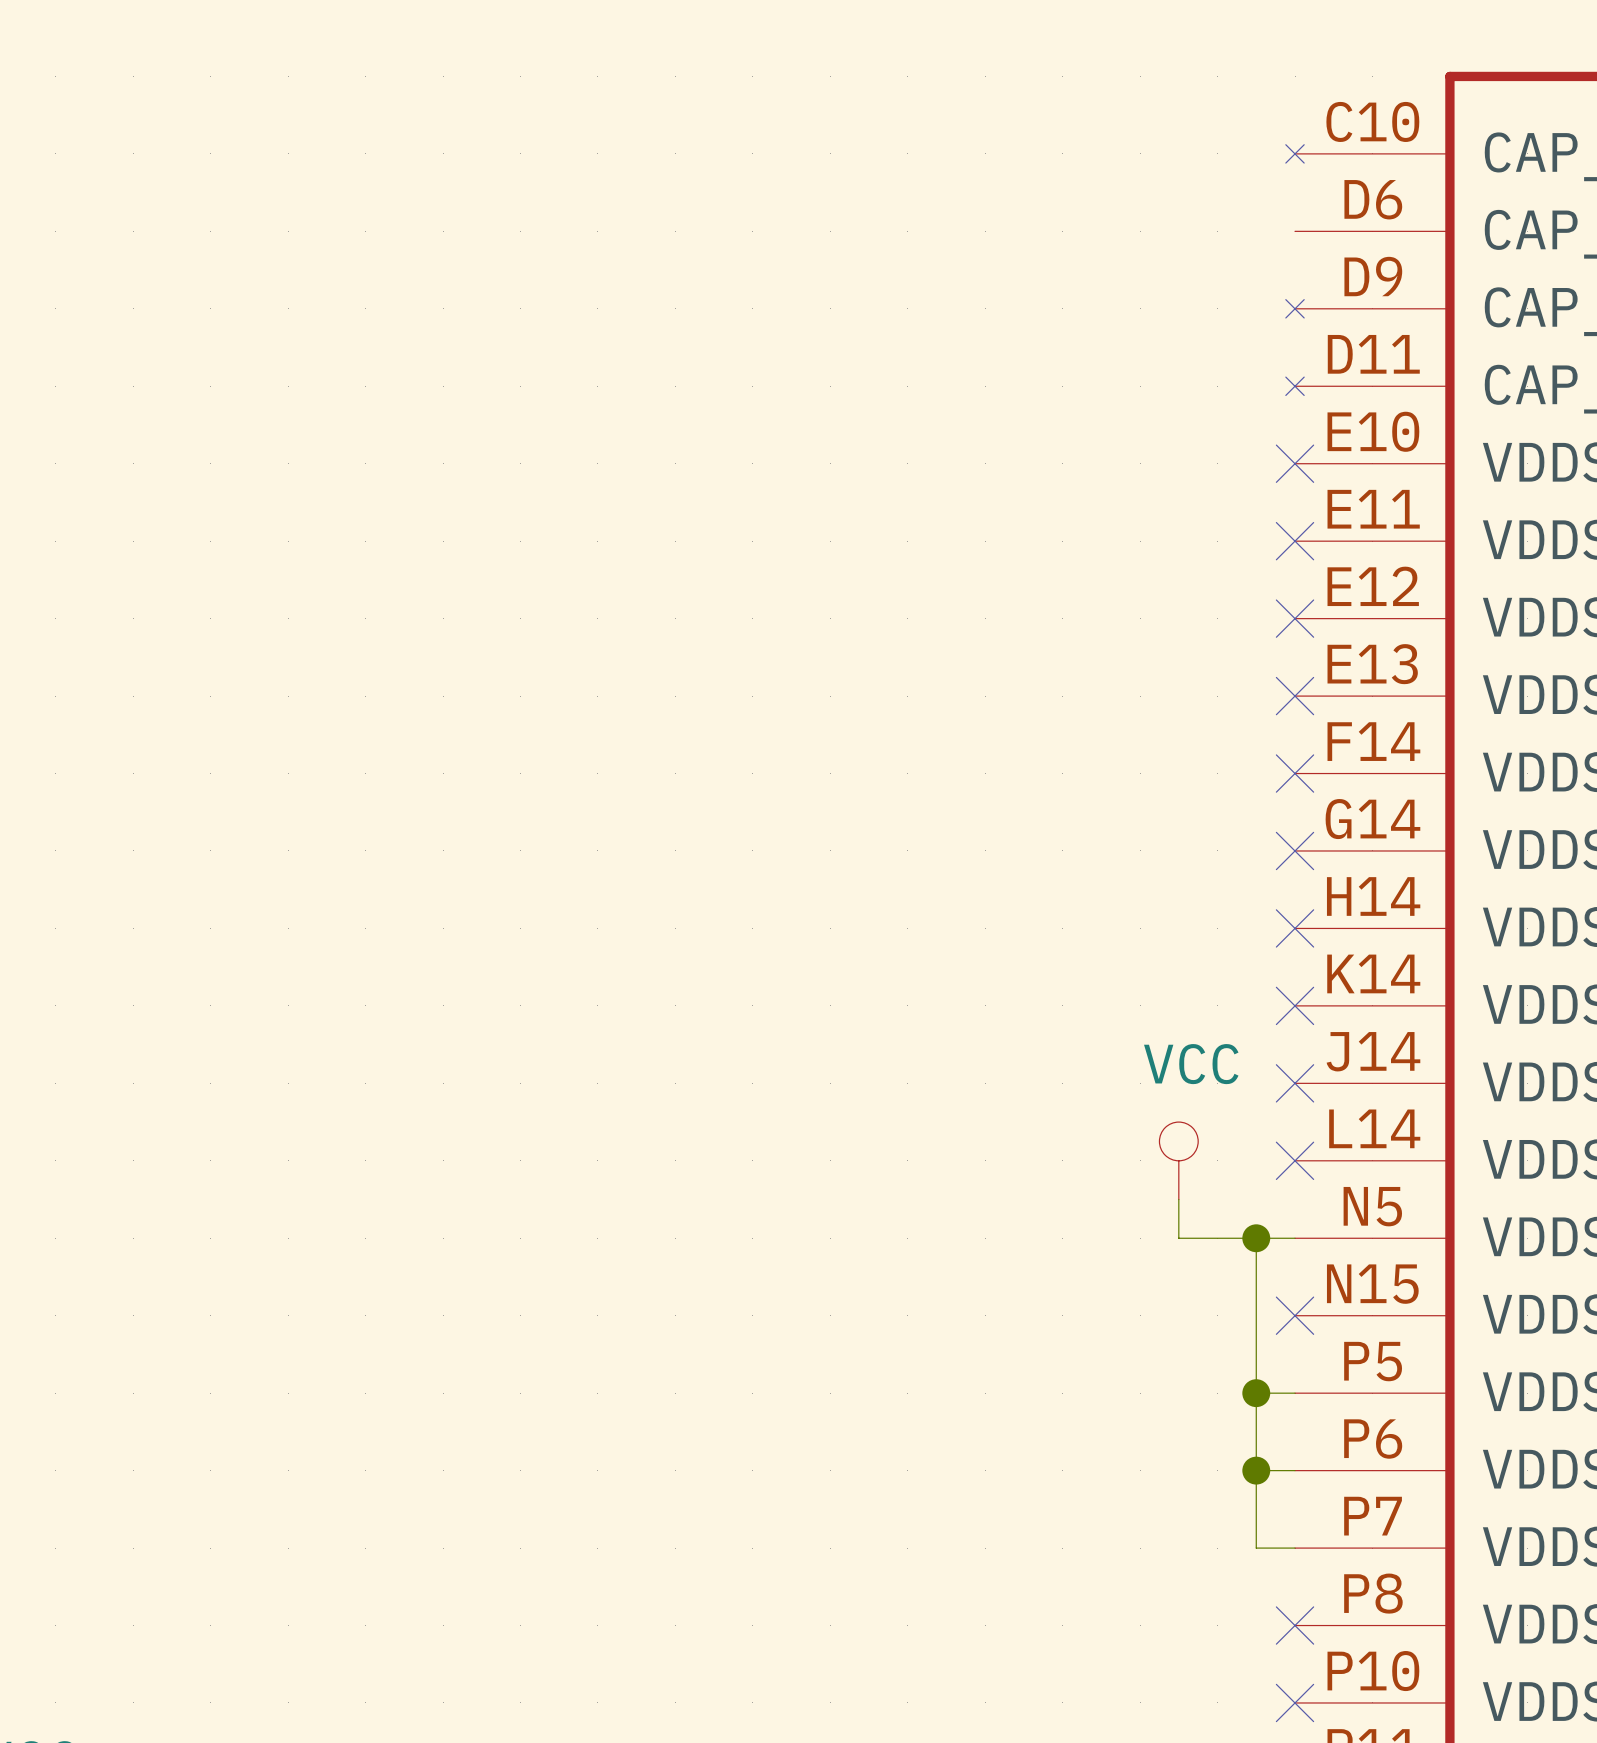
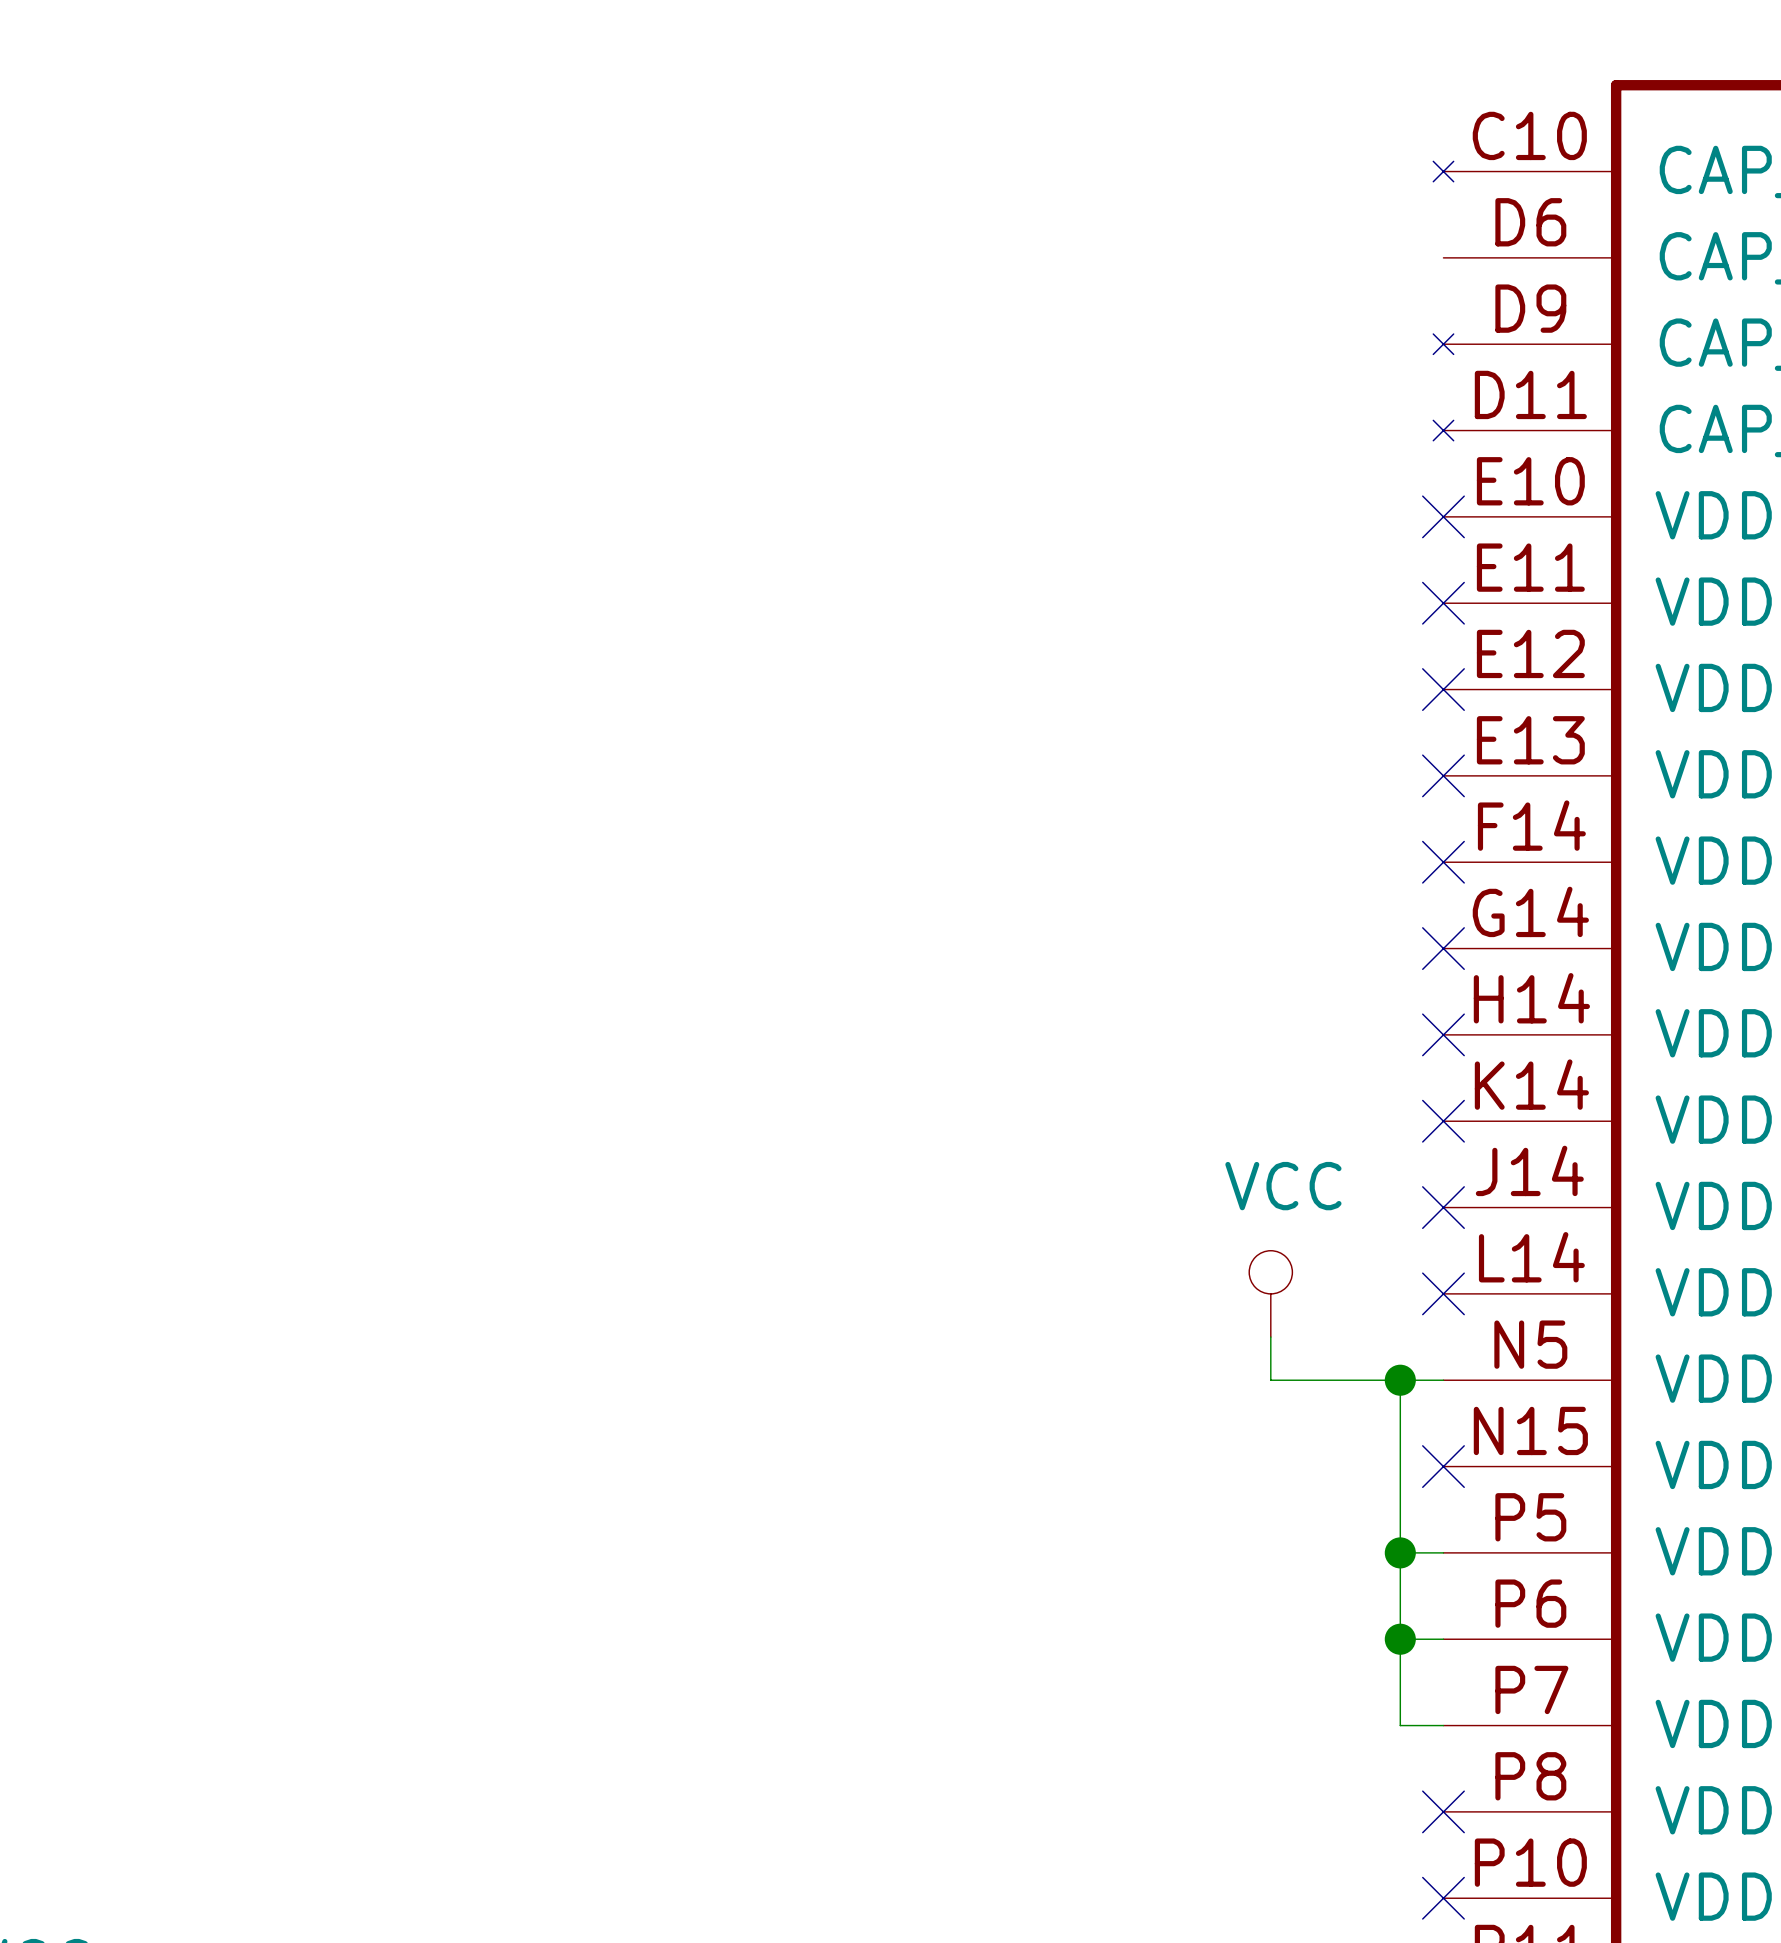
power symbol position: VCC (1178, 1160) -> VCC (1270, 1293)
wire: (1178, 1199) (1178, 1238) -> (1270, 1337) (1270, 1380) (1313, 1380)

